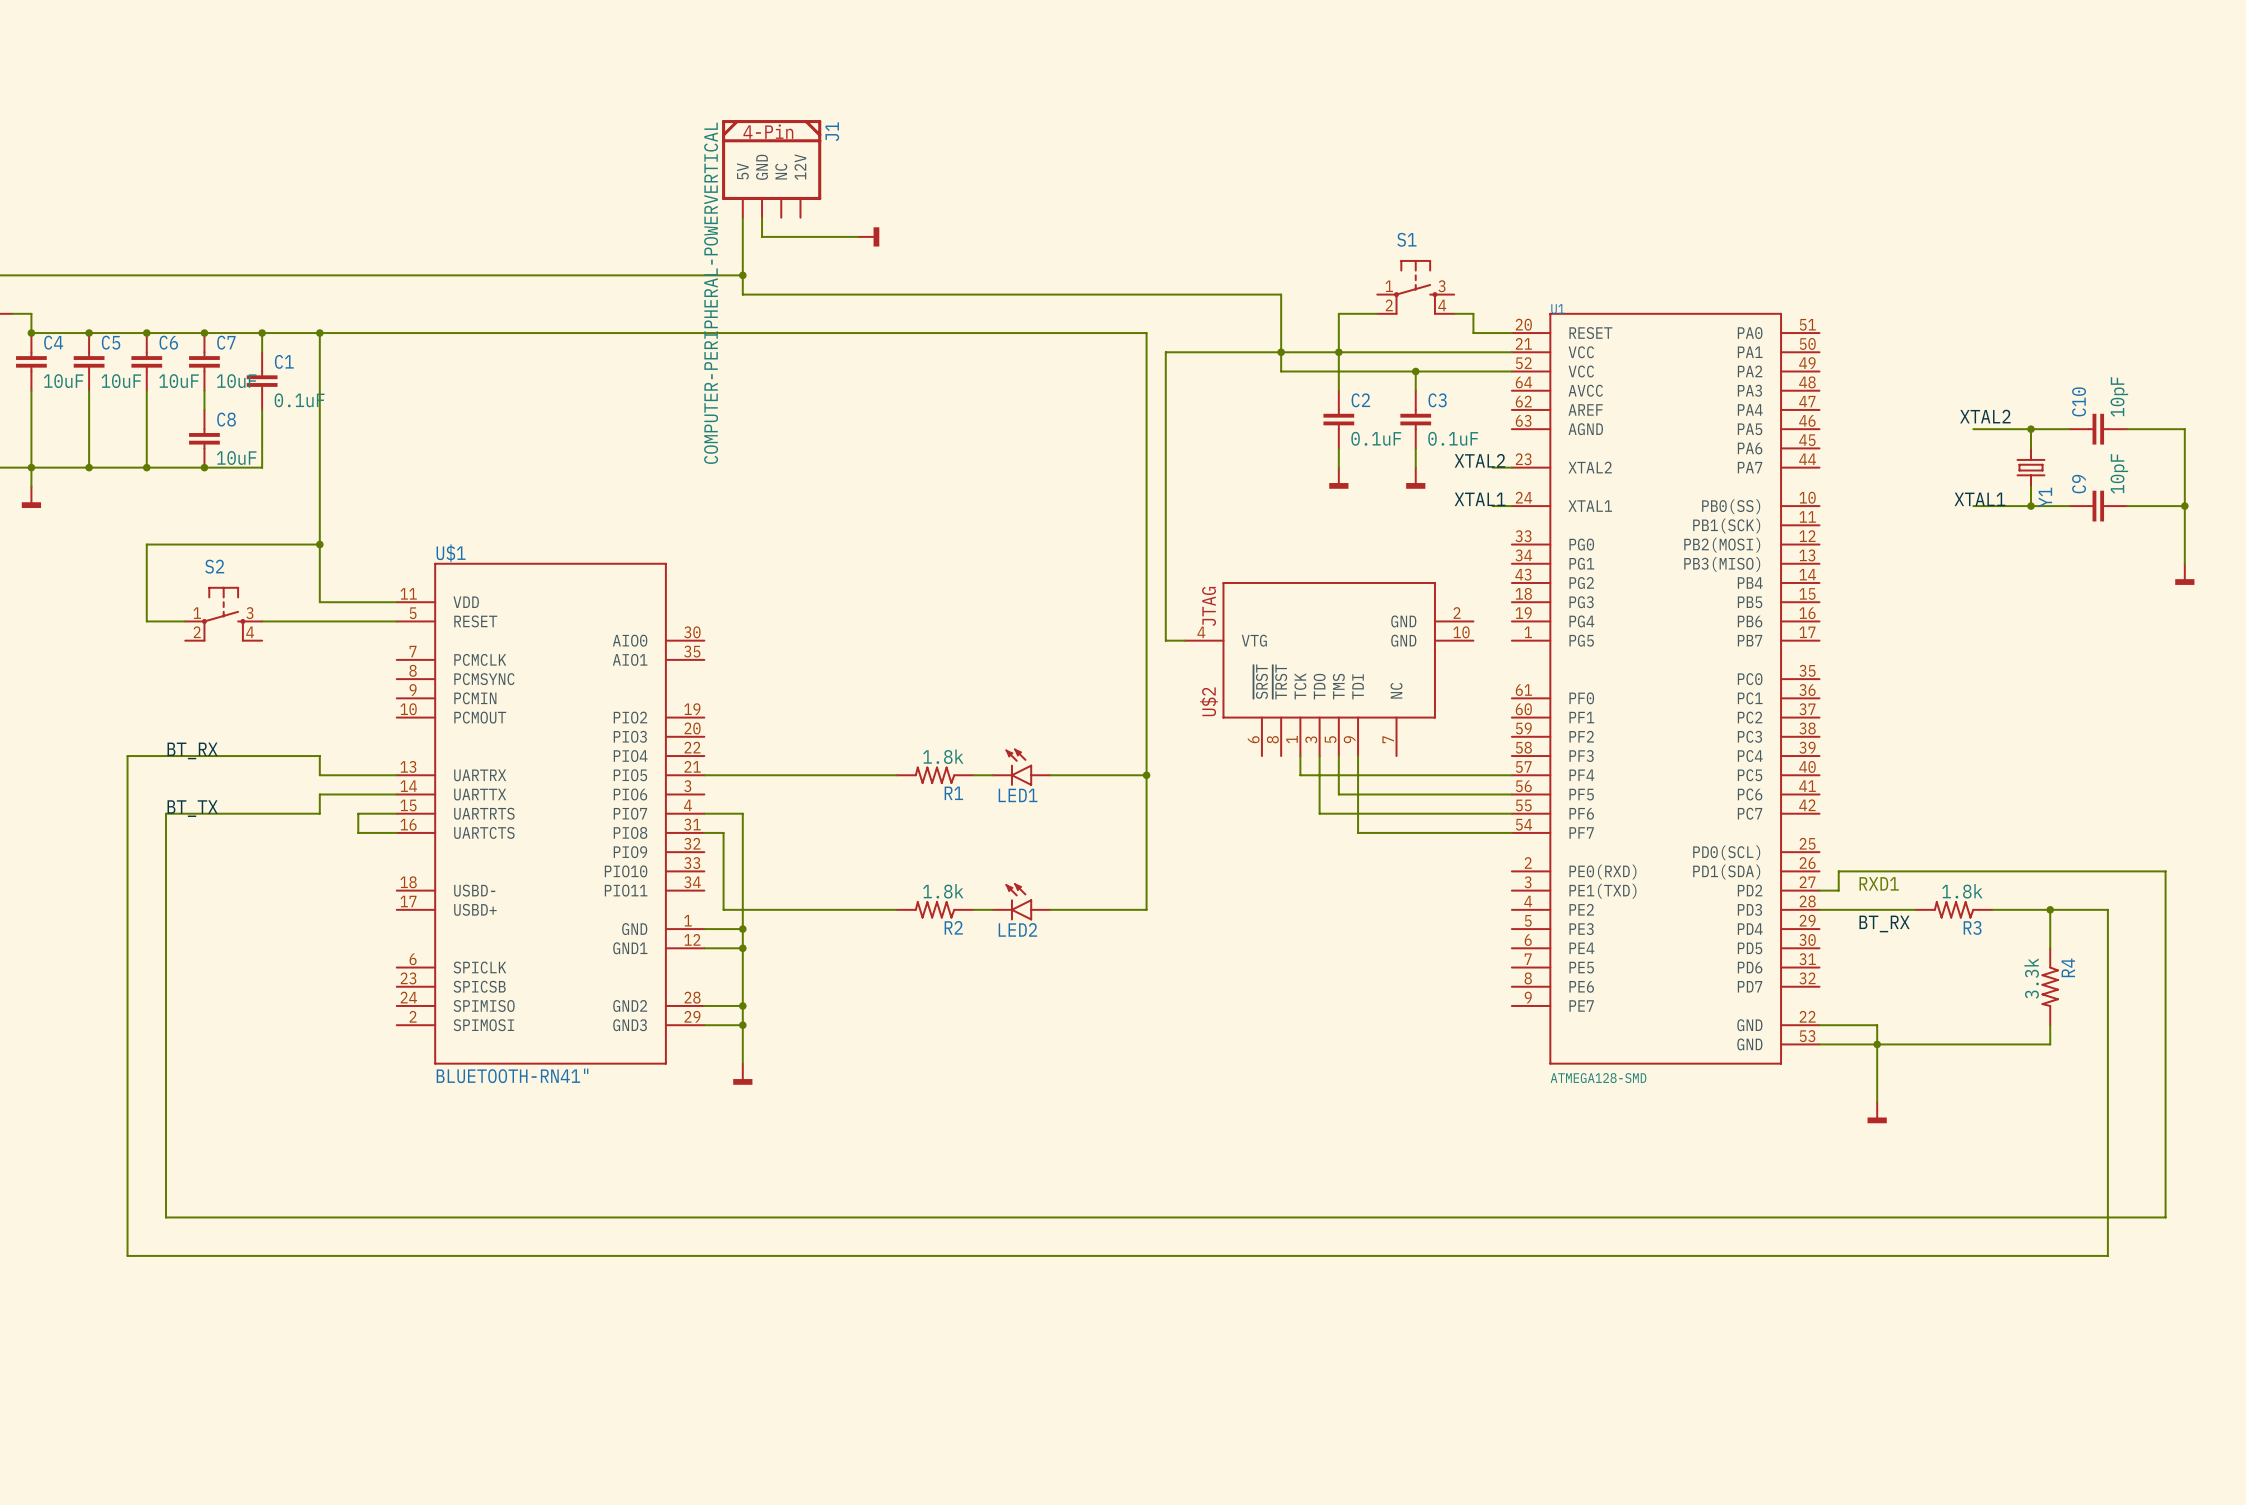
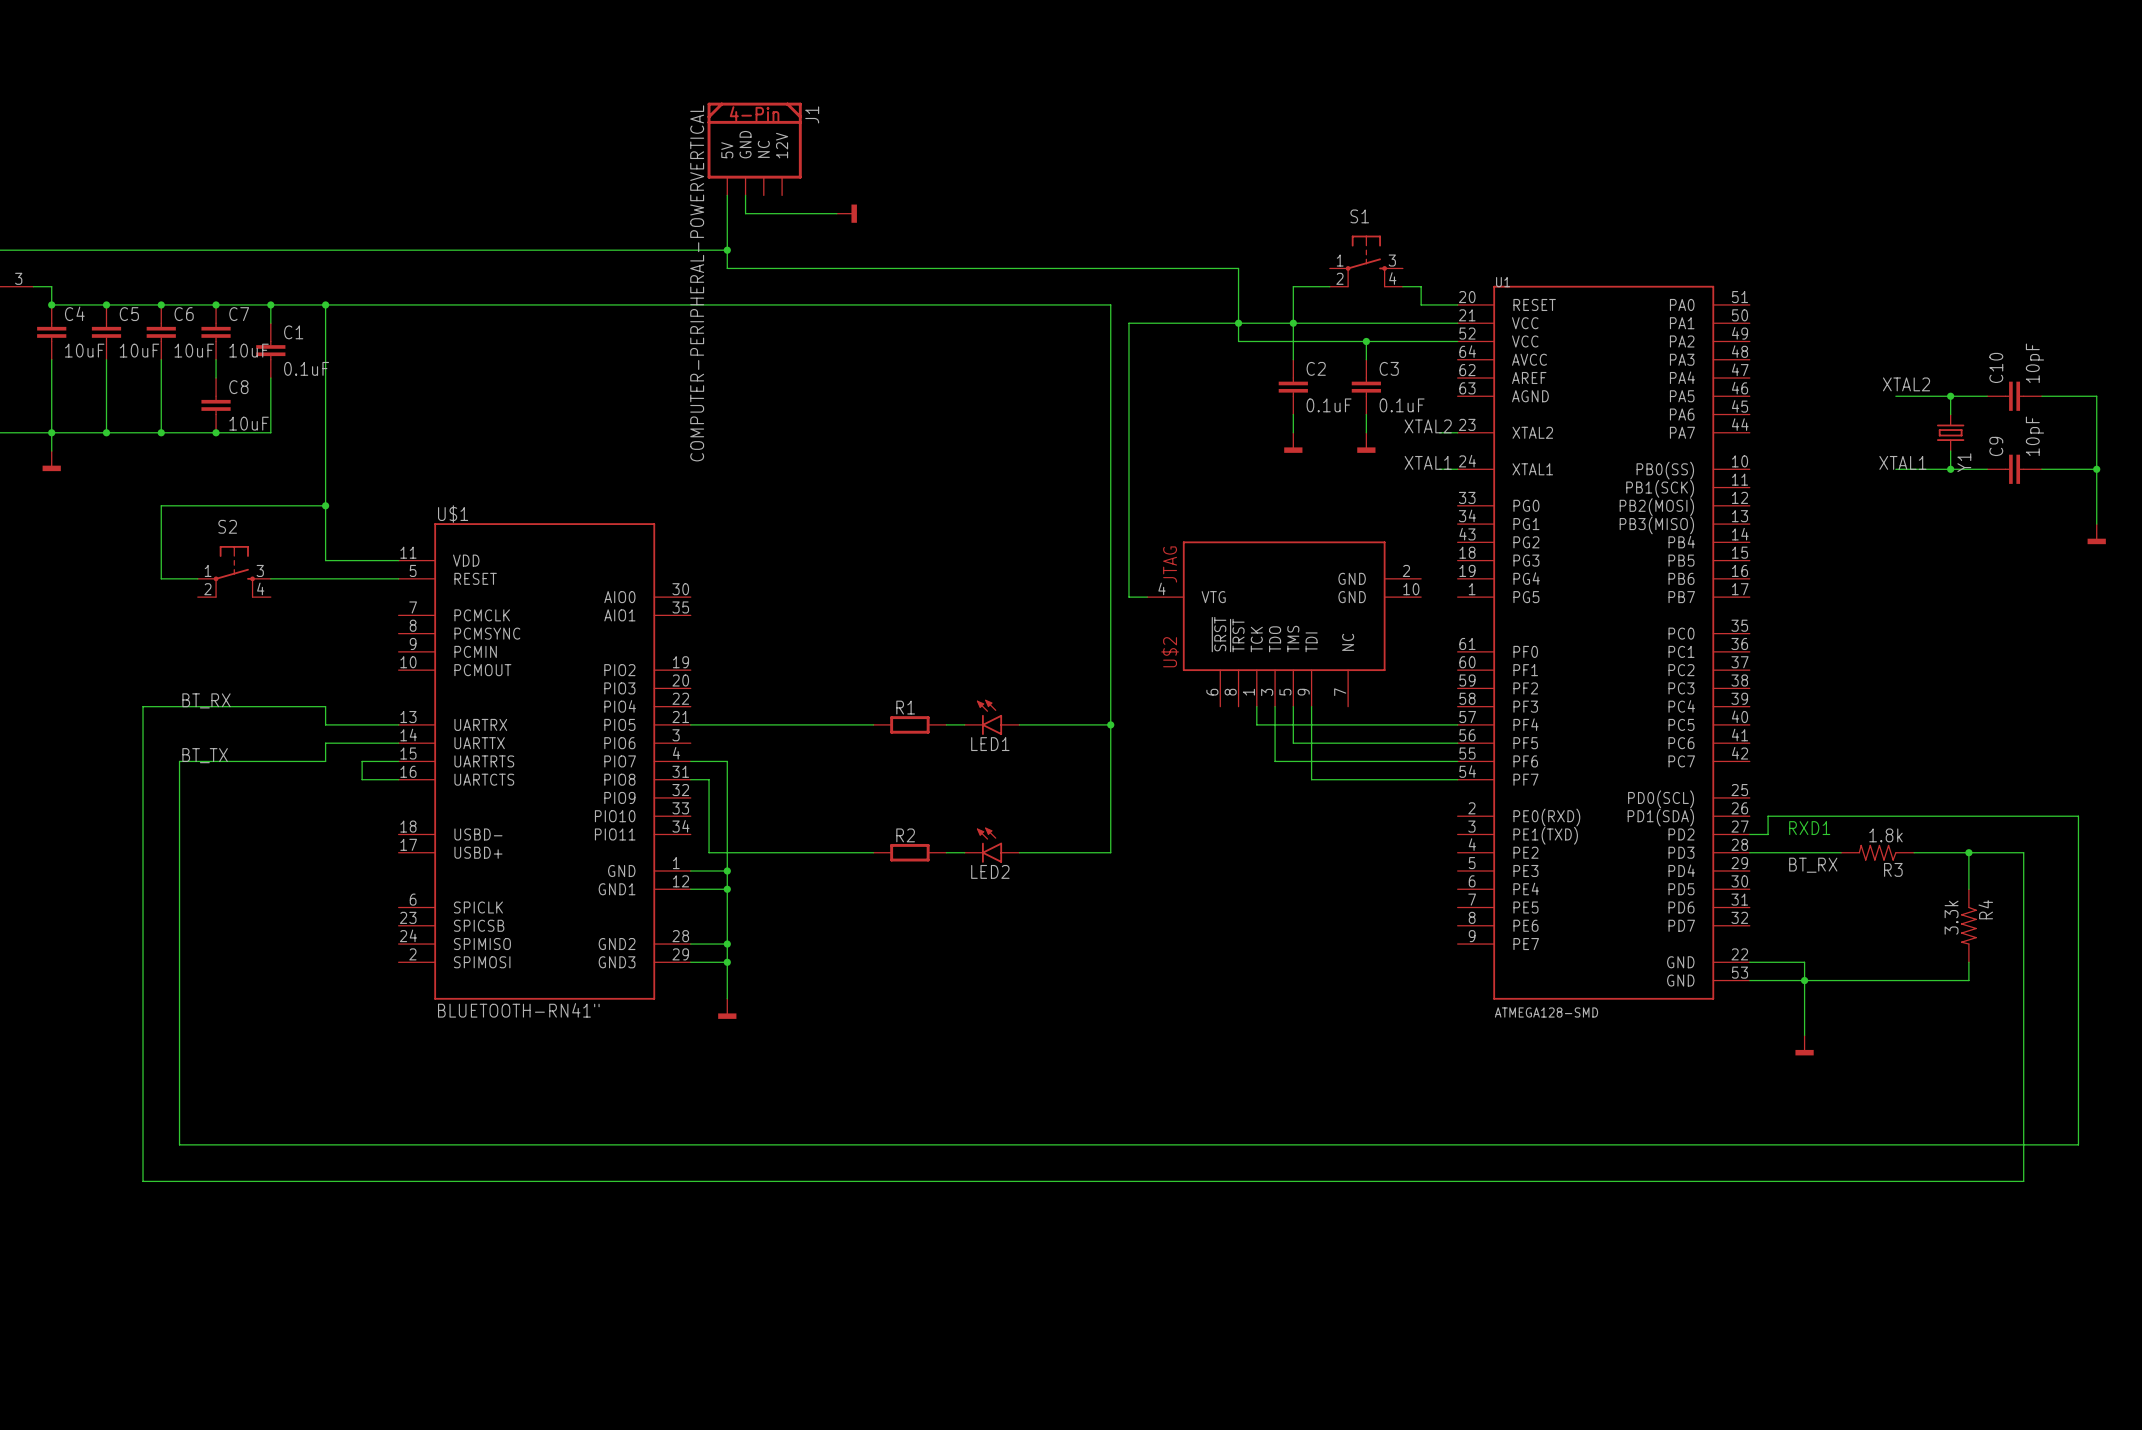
R1 value: 1.8k (943, 756) -> none
R1 symbol: [896, 766, 974, 784] -> [873, 716, 947, 734]
R1 name position: R1 (953, 793) -> R1 (905, 707)
R2 value: 1.8k (943, 891) -> none
R2 symbol: [896, 901, 974, 919] -> [873, 843, 947, 862]
R2 name position: R2 (953, 927) -> R2 (905, 835)

